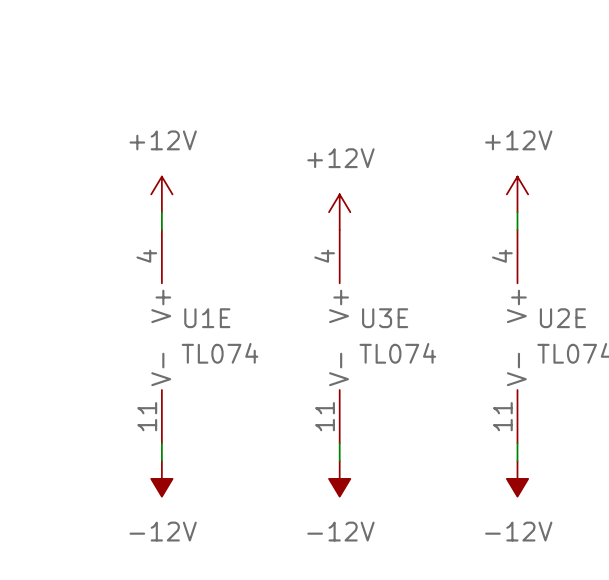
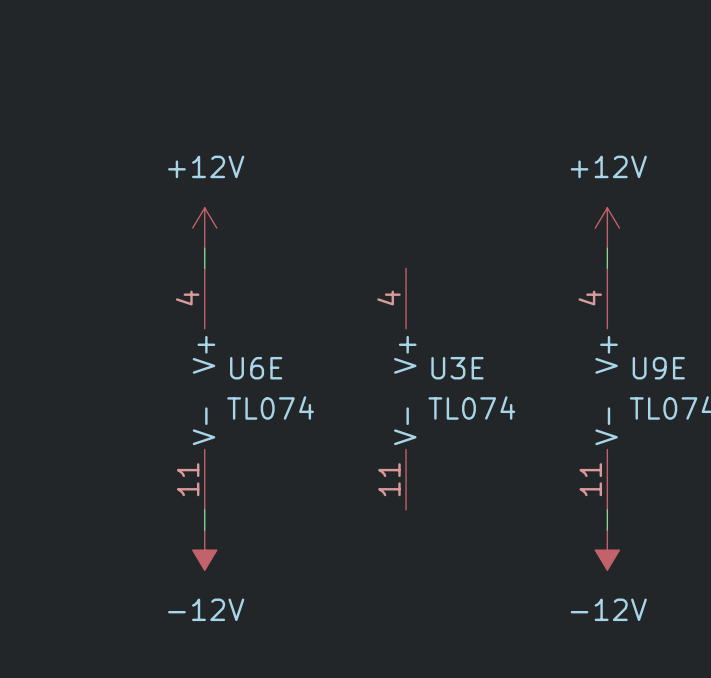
power symbol: +12V (339, 212) -> none
U1E name: U1E (207, 318) -> U6E (256, 368)
U2E name: U2E (562, 318) -> U9E (658, 368)
wire: (339, 443) (339, 461) -> none
power symbol: -12V (339, 478) -> none

